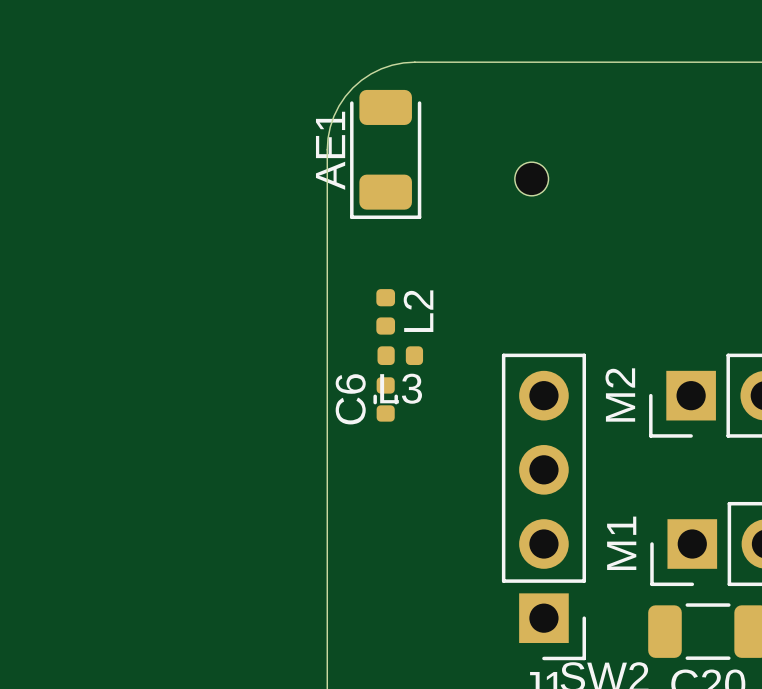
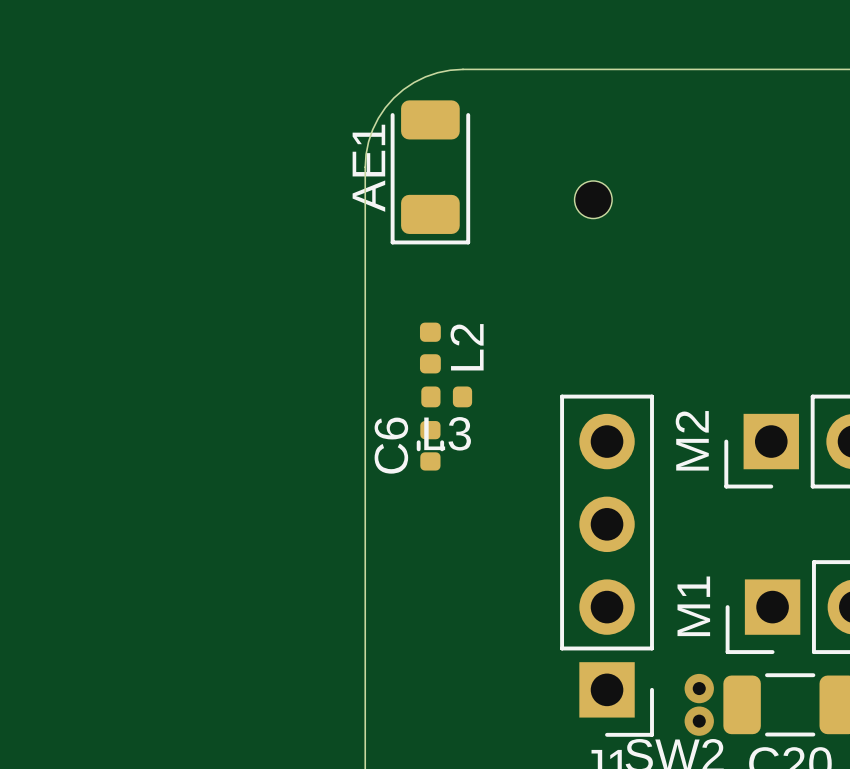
via: none -> (699, 688)
via: none -> (699, 721)

